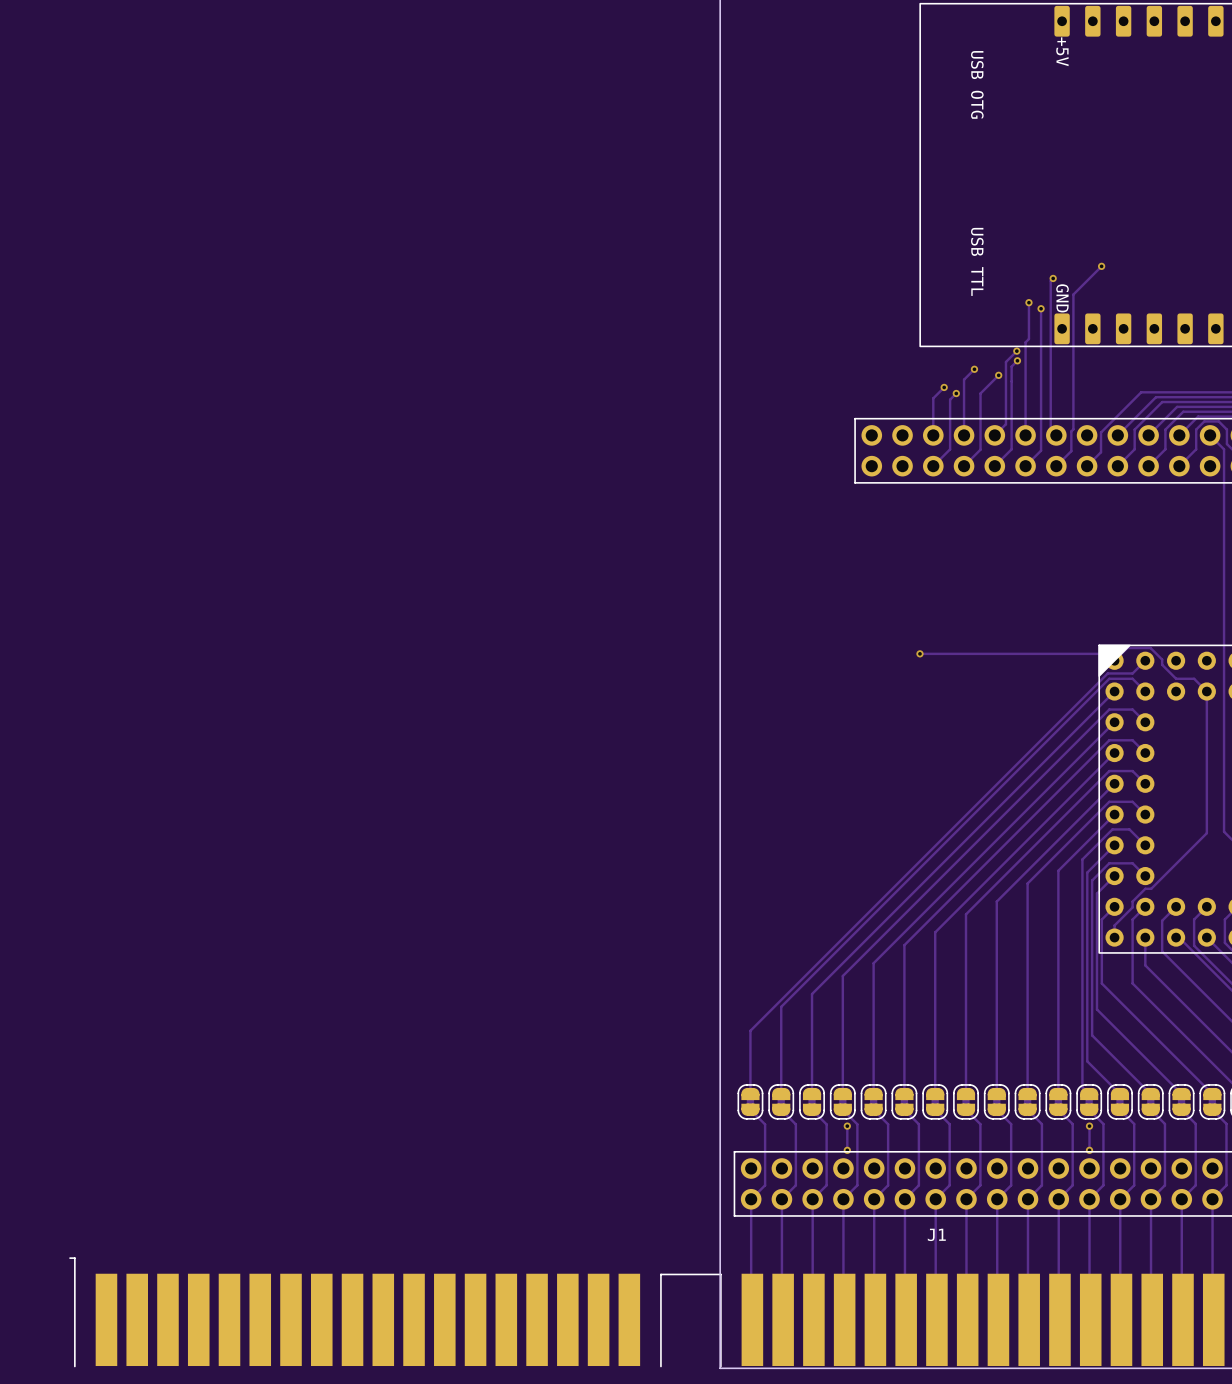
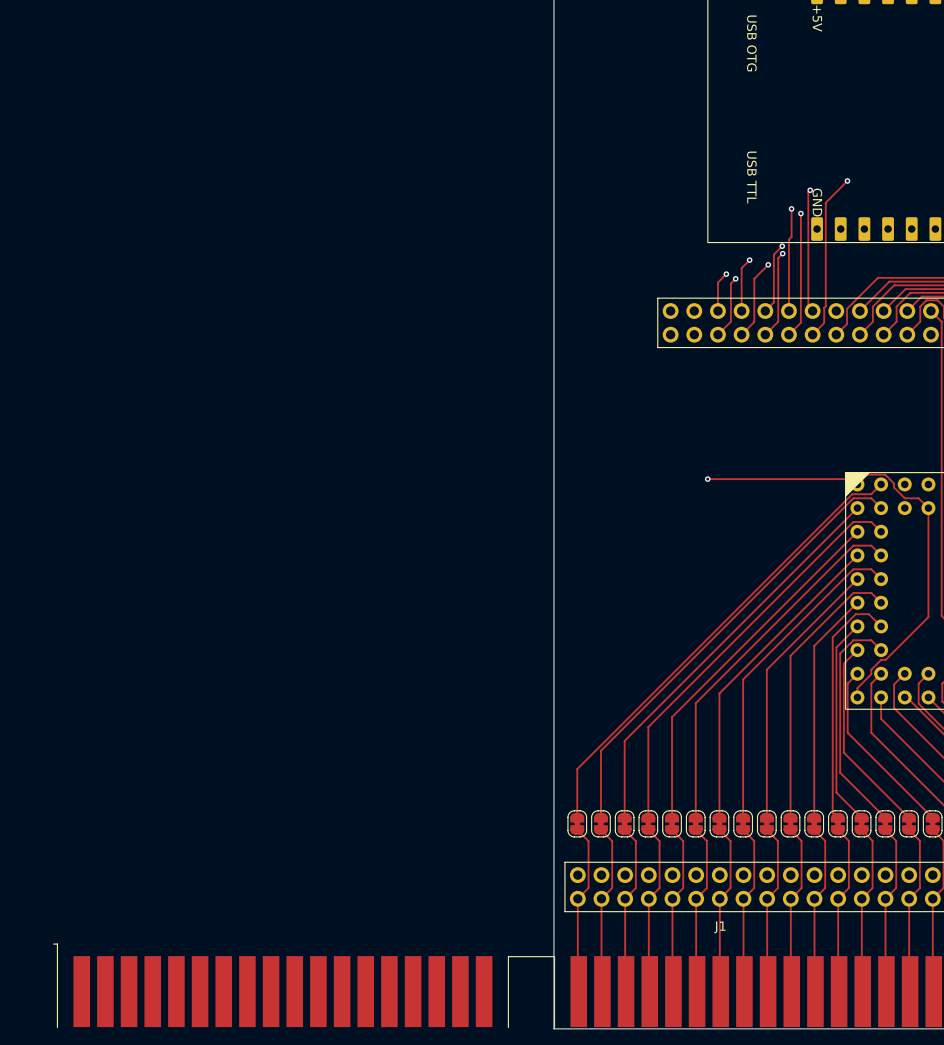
track: (847, 1126) (847, 1150) -> none
via: (847, 1126) -> none
track: (1089, 1126) (1089, 1150) -> none
via: (1089, 1126) -> none
via: (847, 1150) -> none
via: (1089, 1150) -> none

